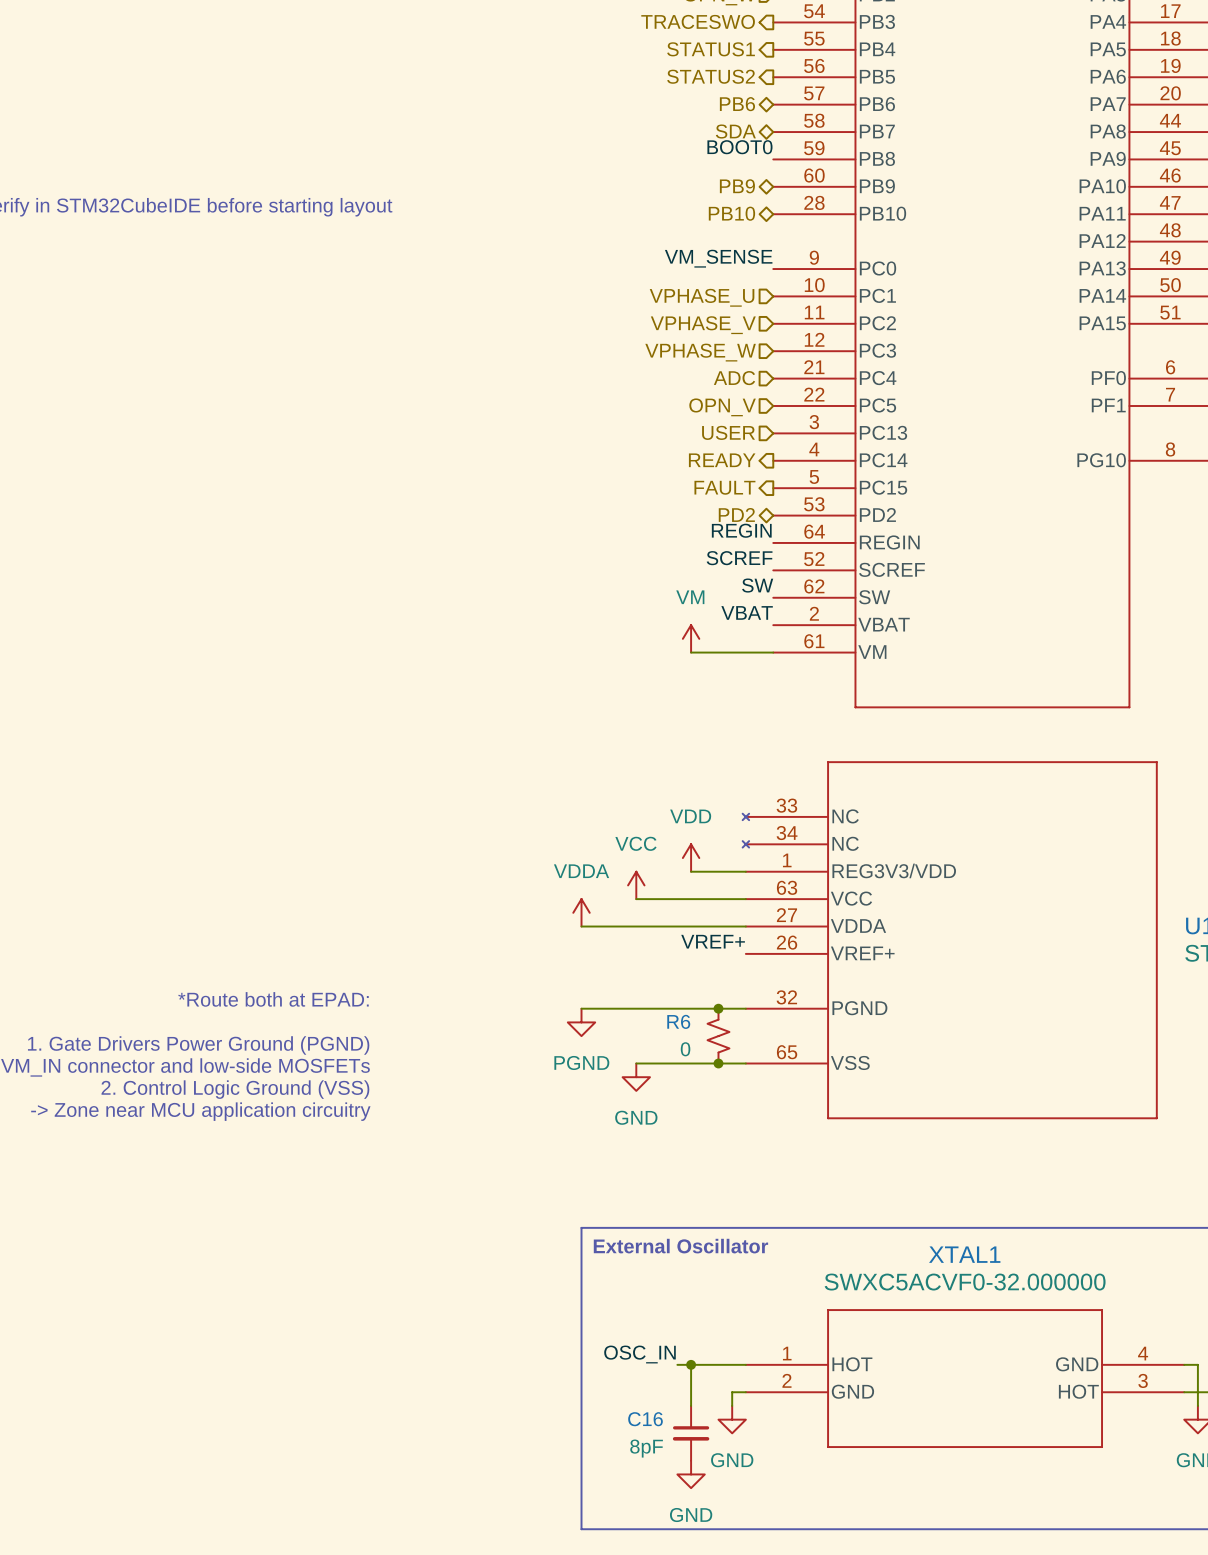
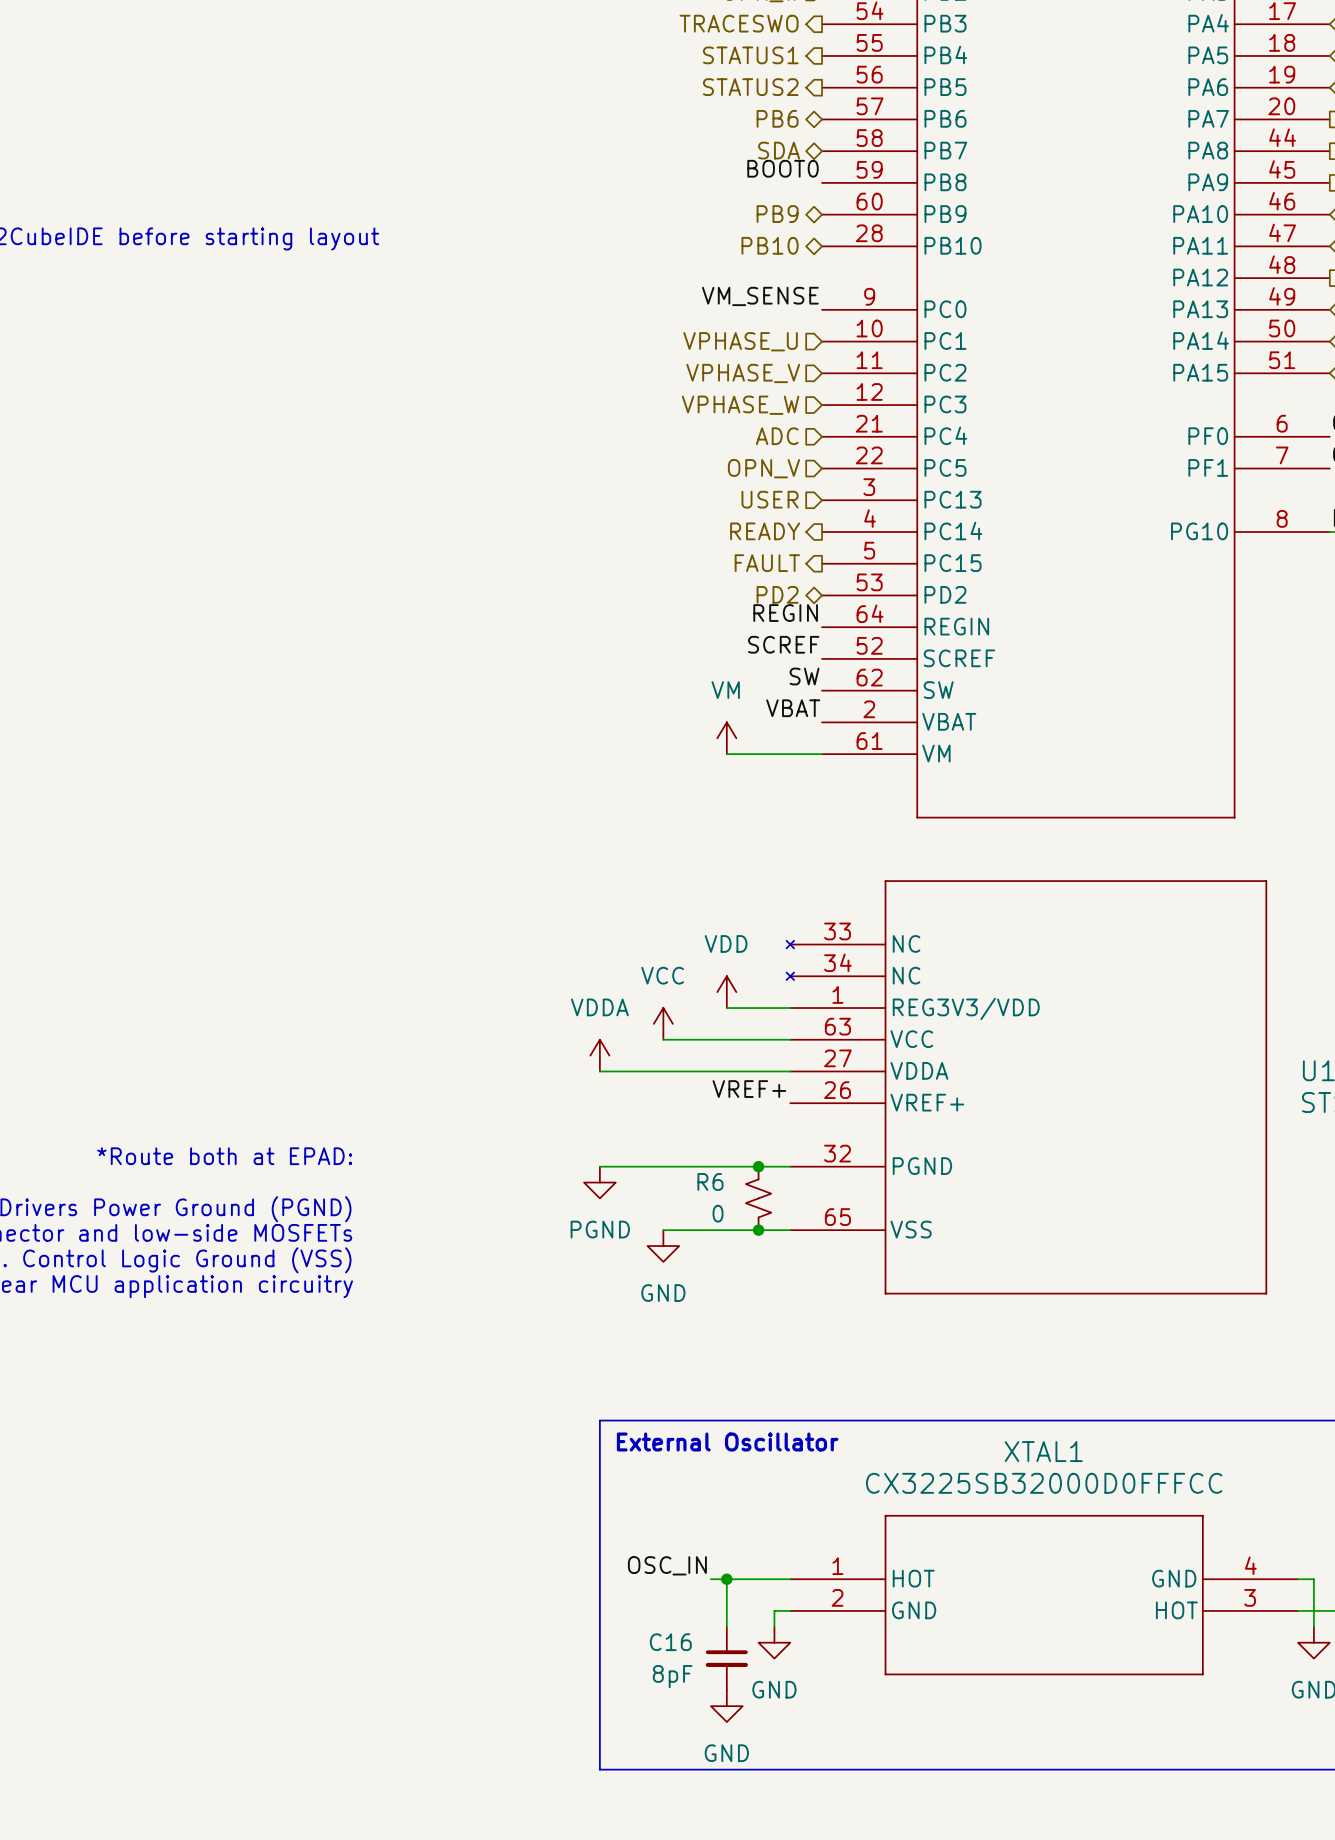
XTAL1 value: SWXC5ACVF0-32.000000 (965, 1282) -> CX3225SB32000D0FFFCC (1044, 1483)

